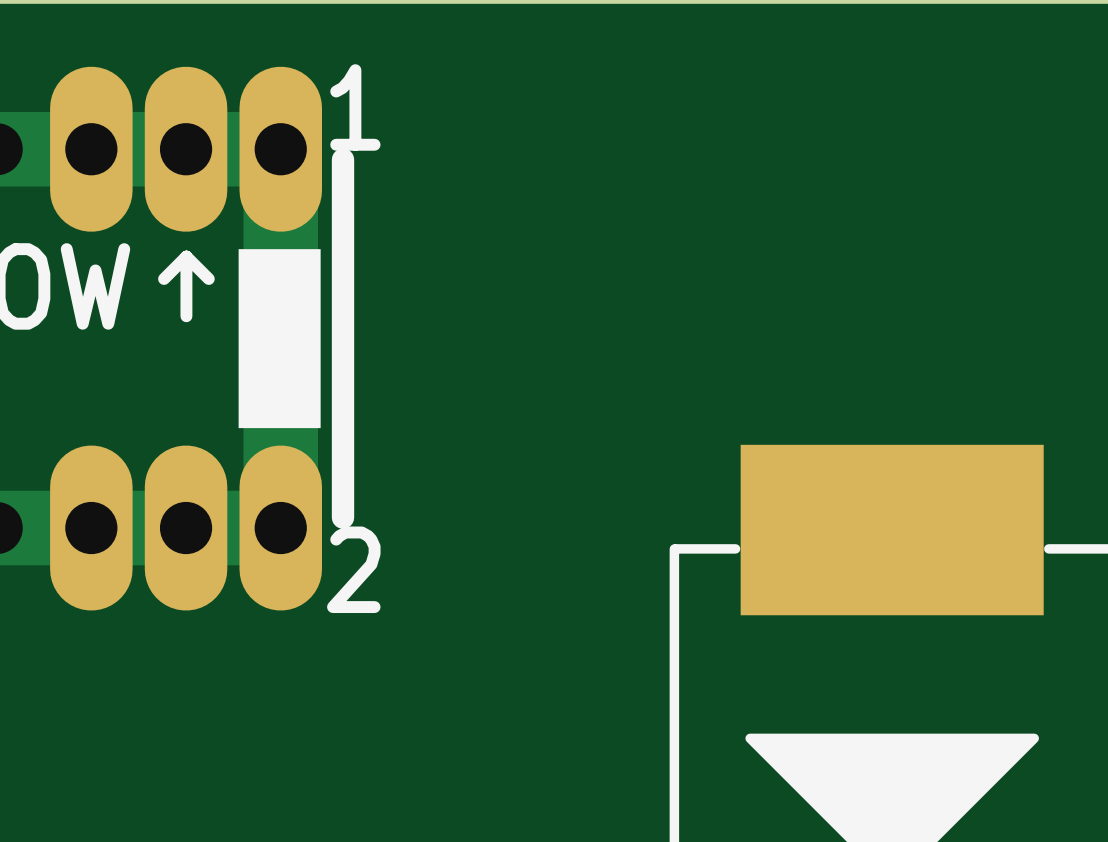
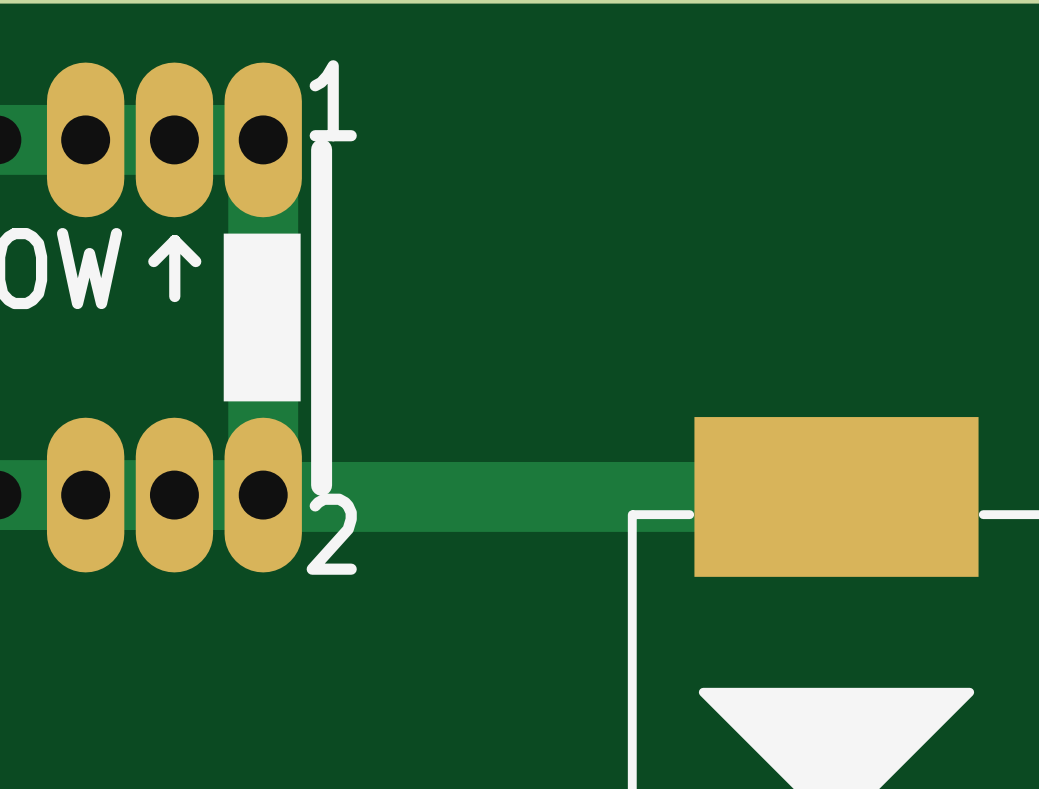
track: none -> (263, 495) (265, 496) (836, 496)

